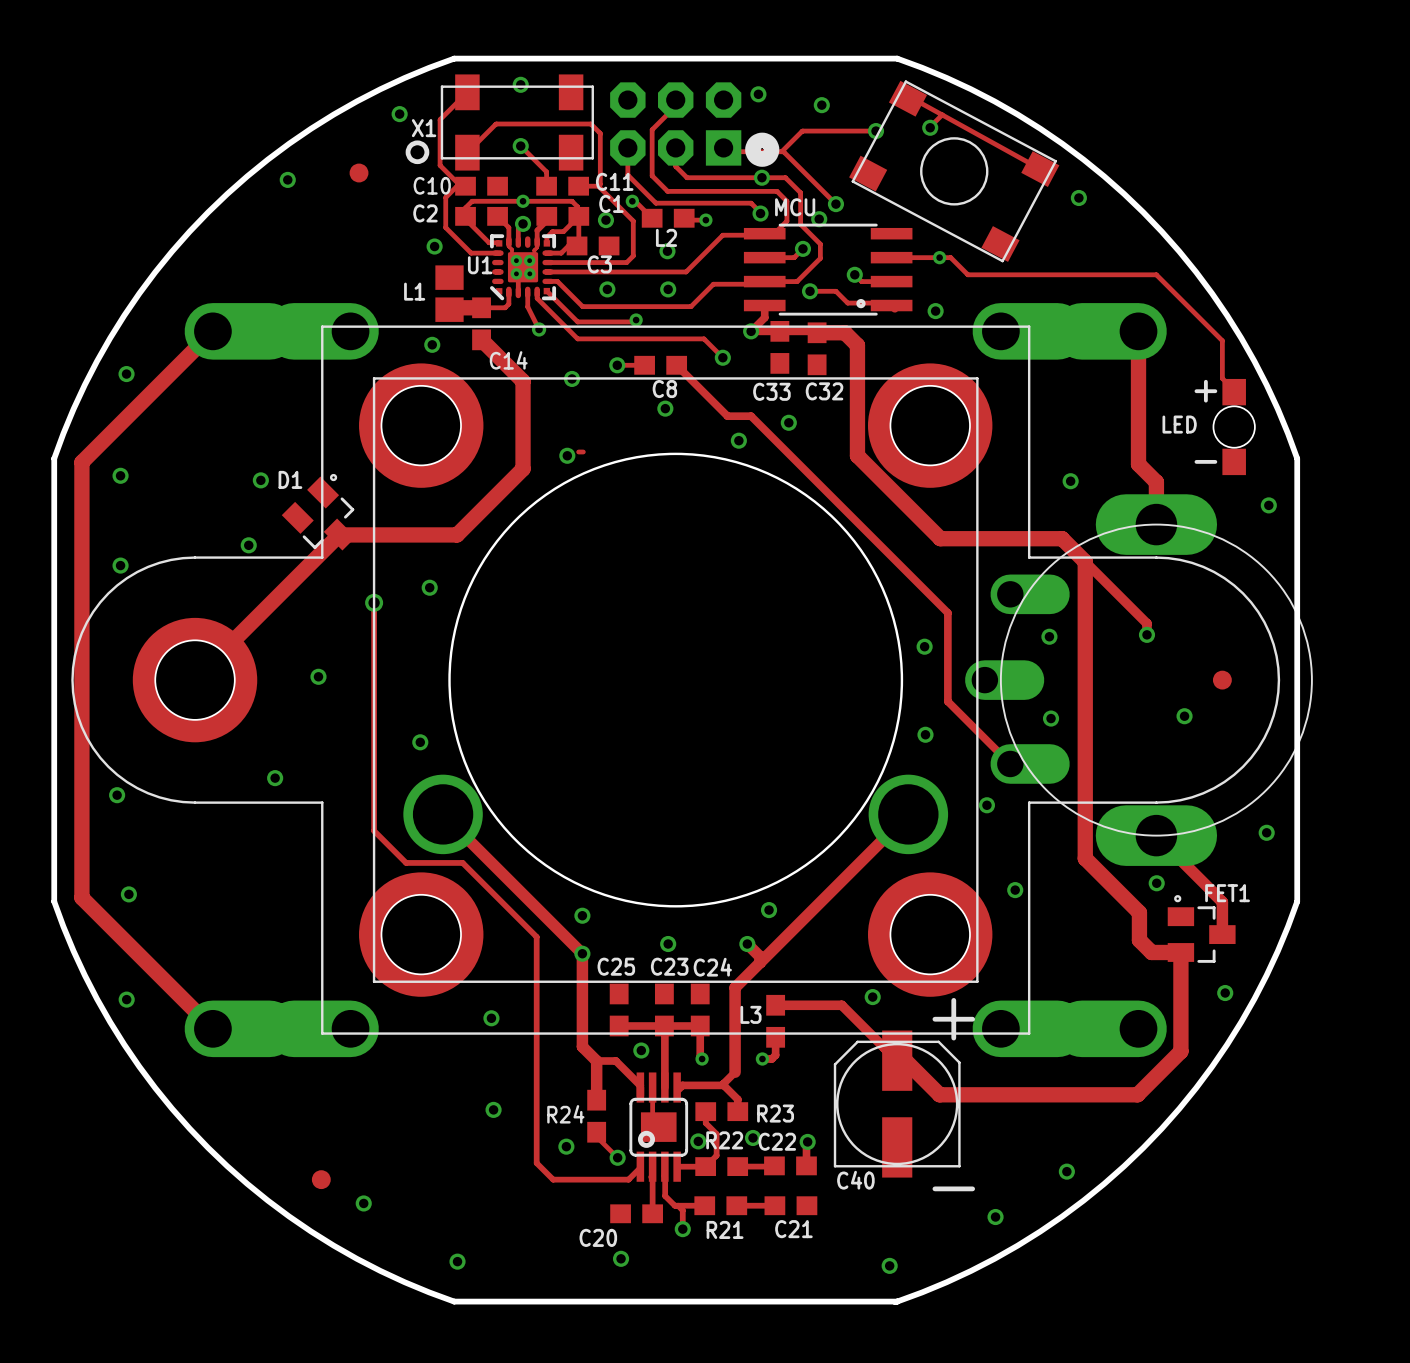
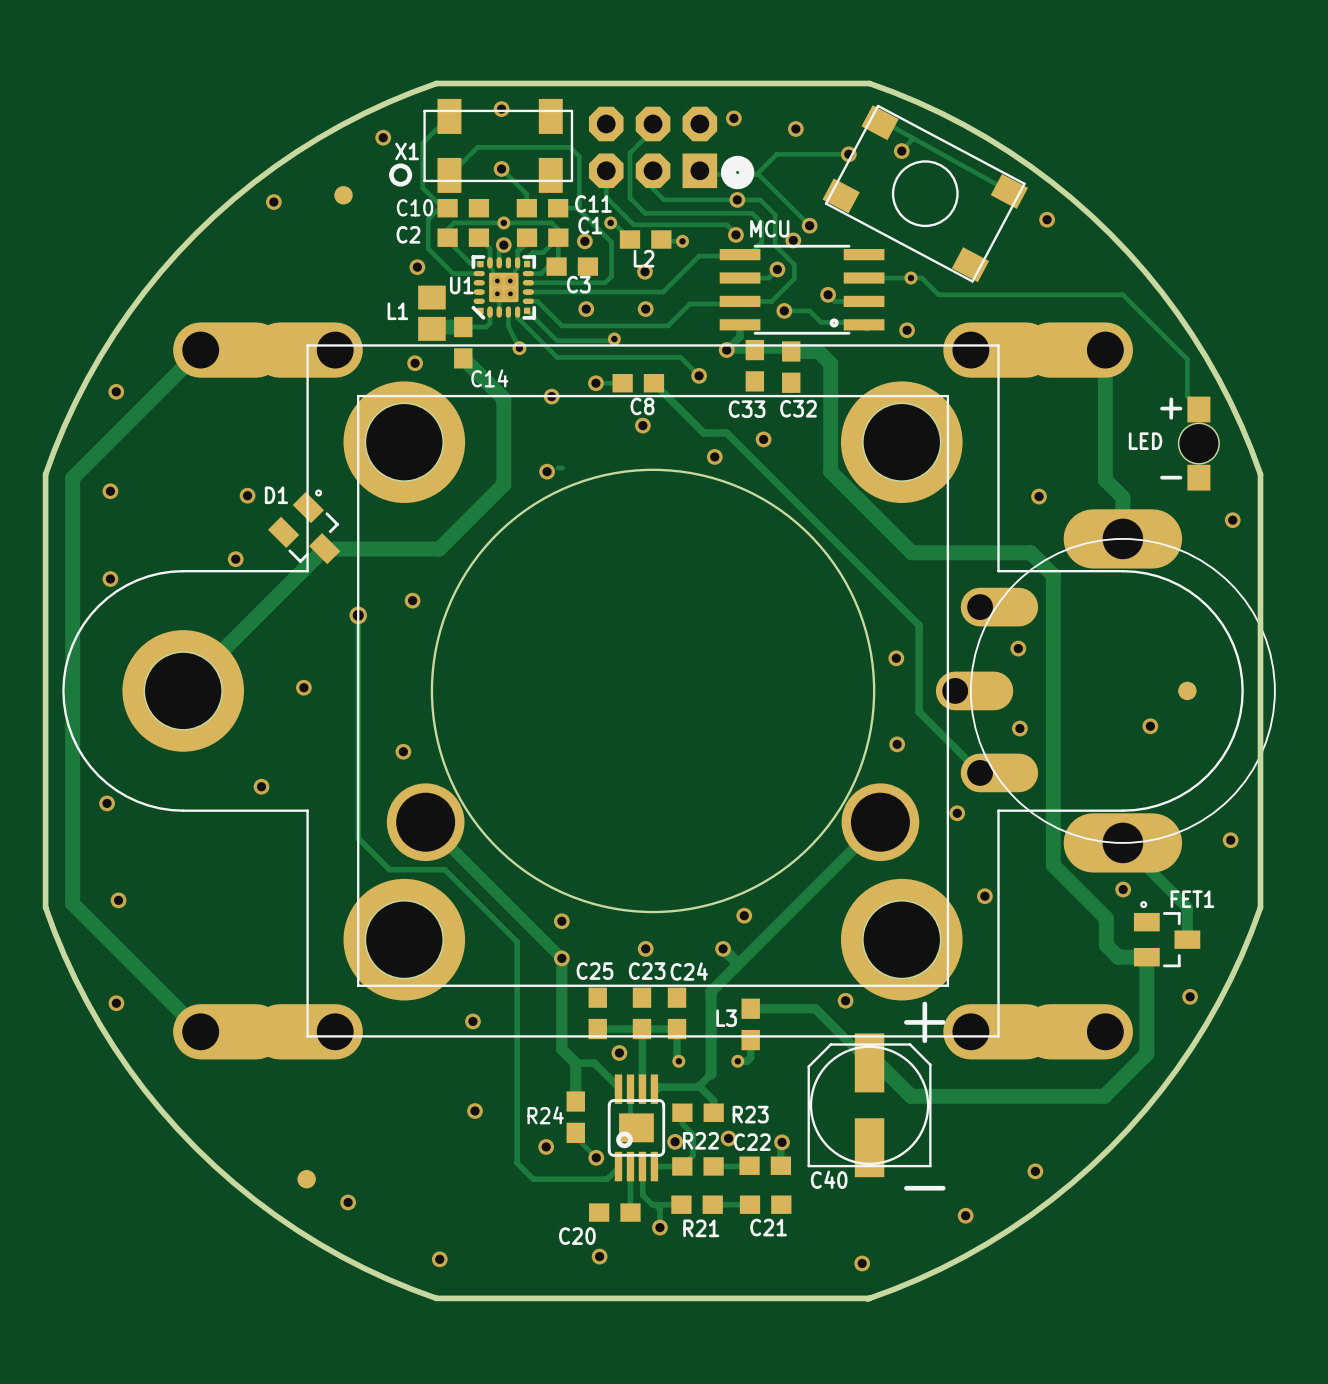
track: (1085, 561) (1146, 623) (1146, 634) -> none
via: (1146, 634) -> none

